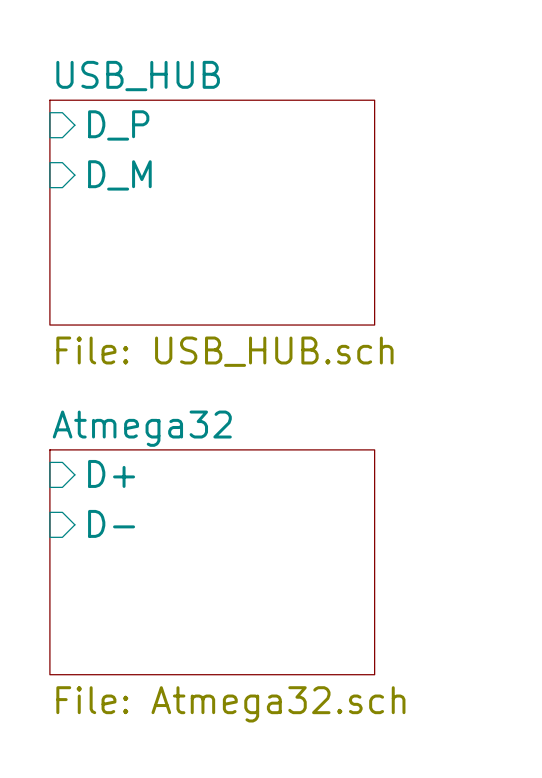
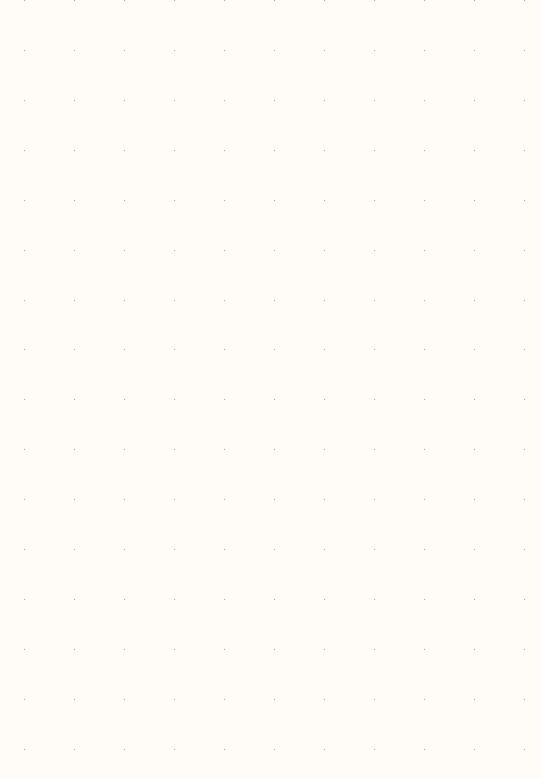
sheet pin: D_P (118, 125) -> none
sheet pin: D_M (119, 175) -> none
sheet USB_HUB: File: USB_HUB.sch (212, 212) -> none
sheet pin: D+ (111, 473) -> none
sheet pin: D- (111, 523) -> none
sheet Atmega32: File: Atmega32.sch (212, 562) -> none

